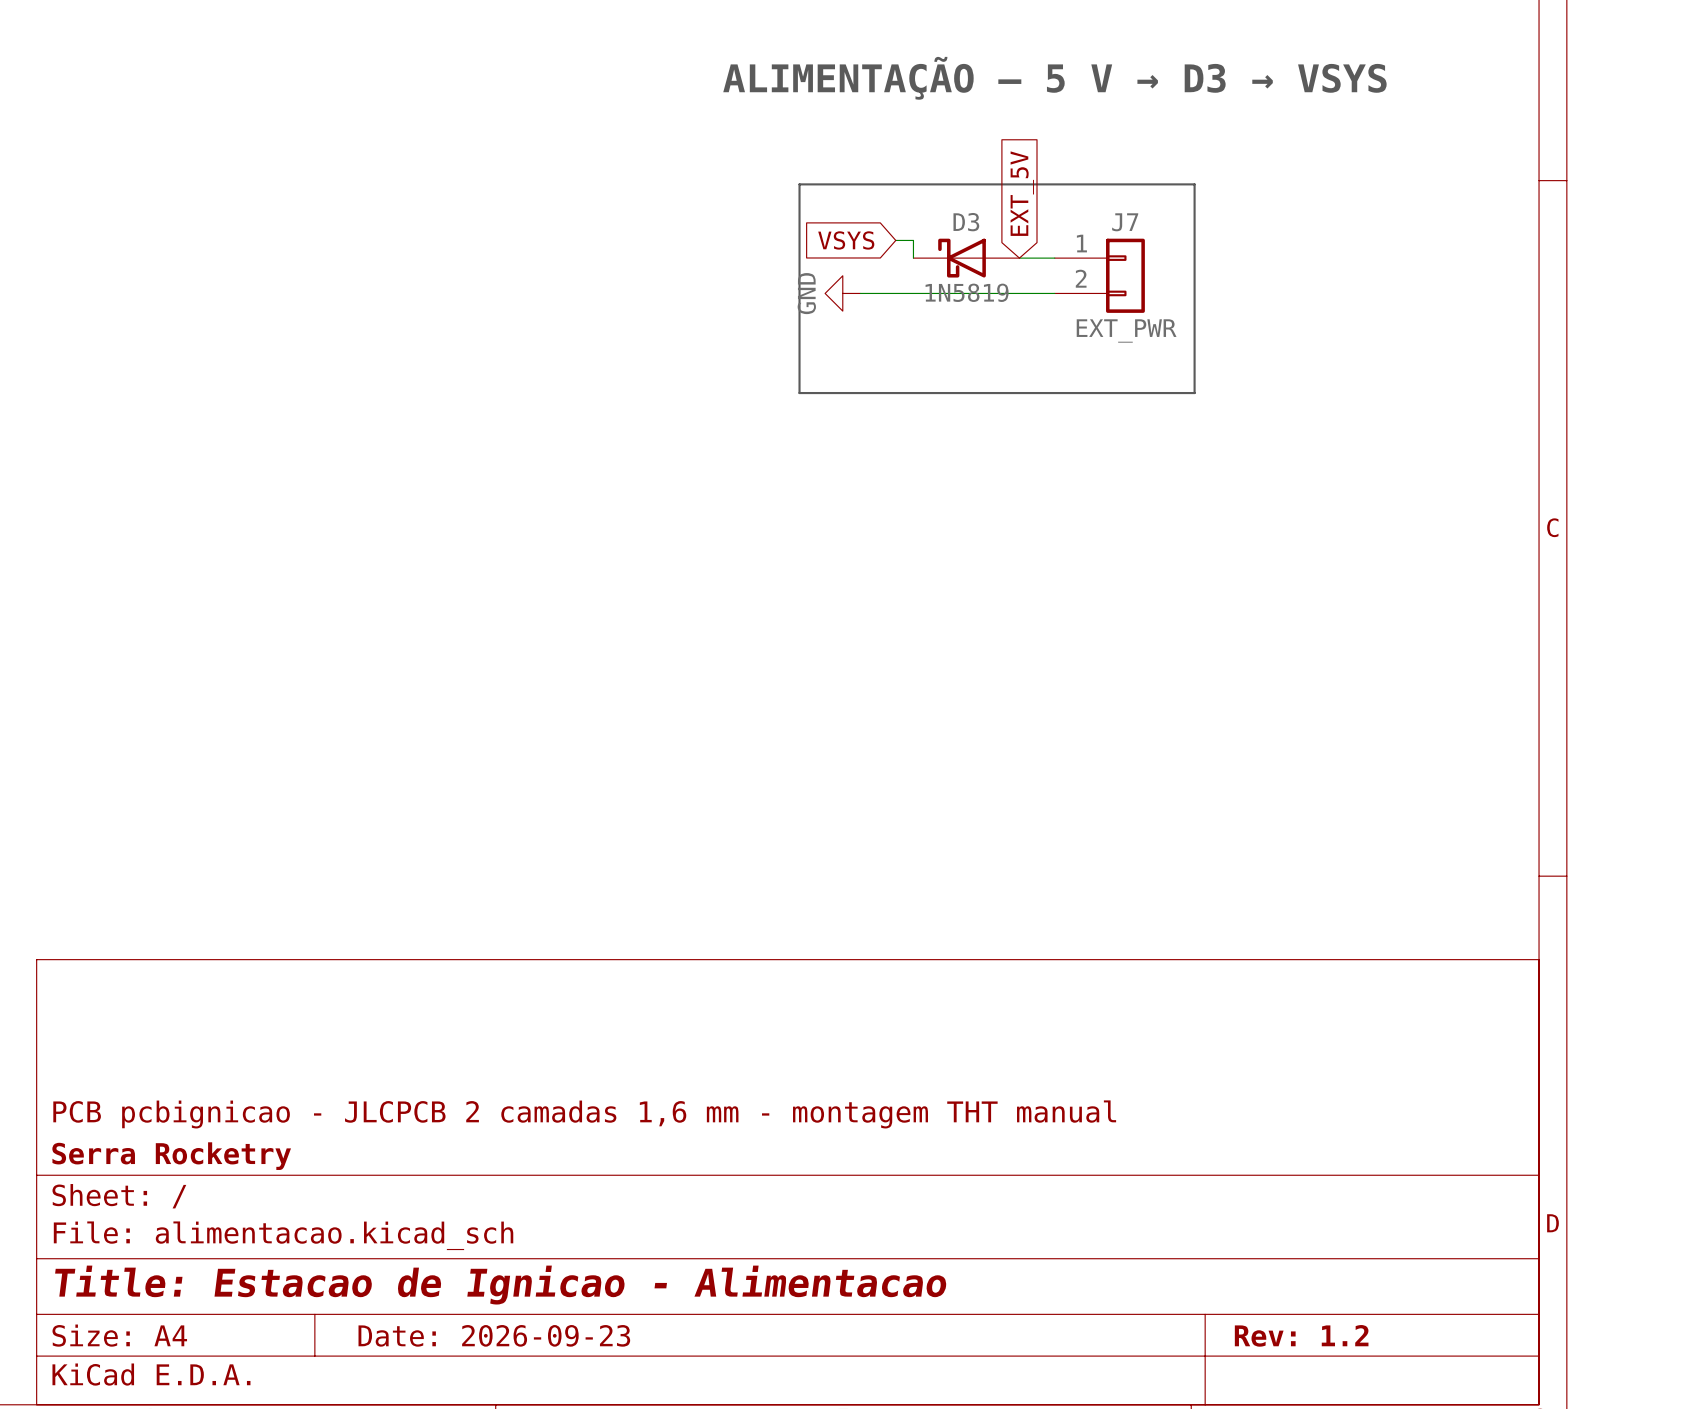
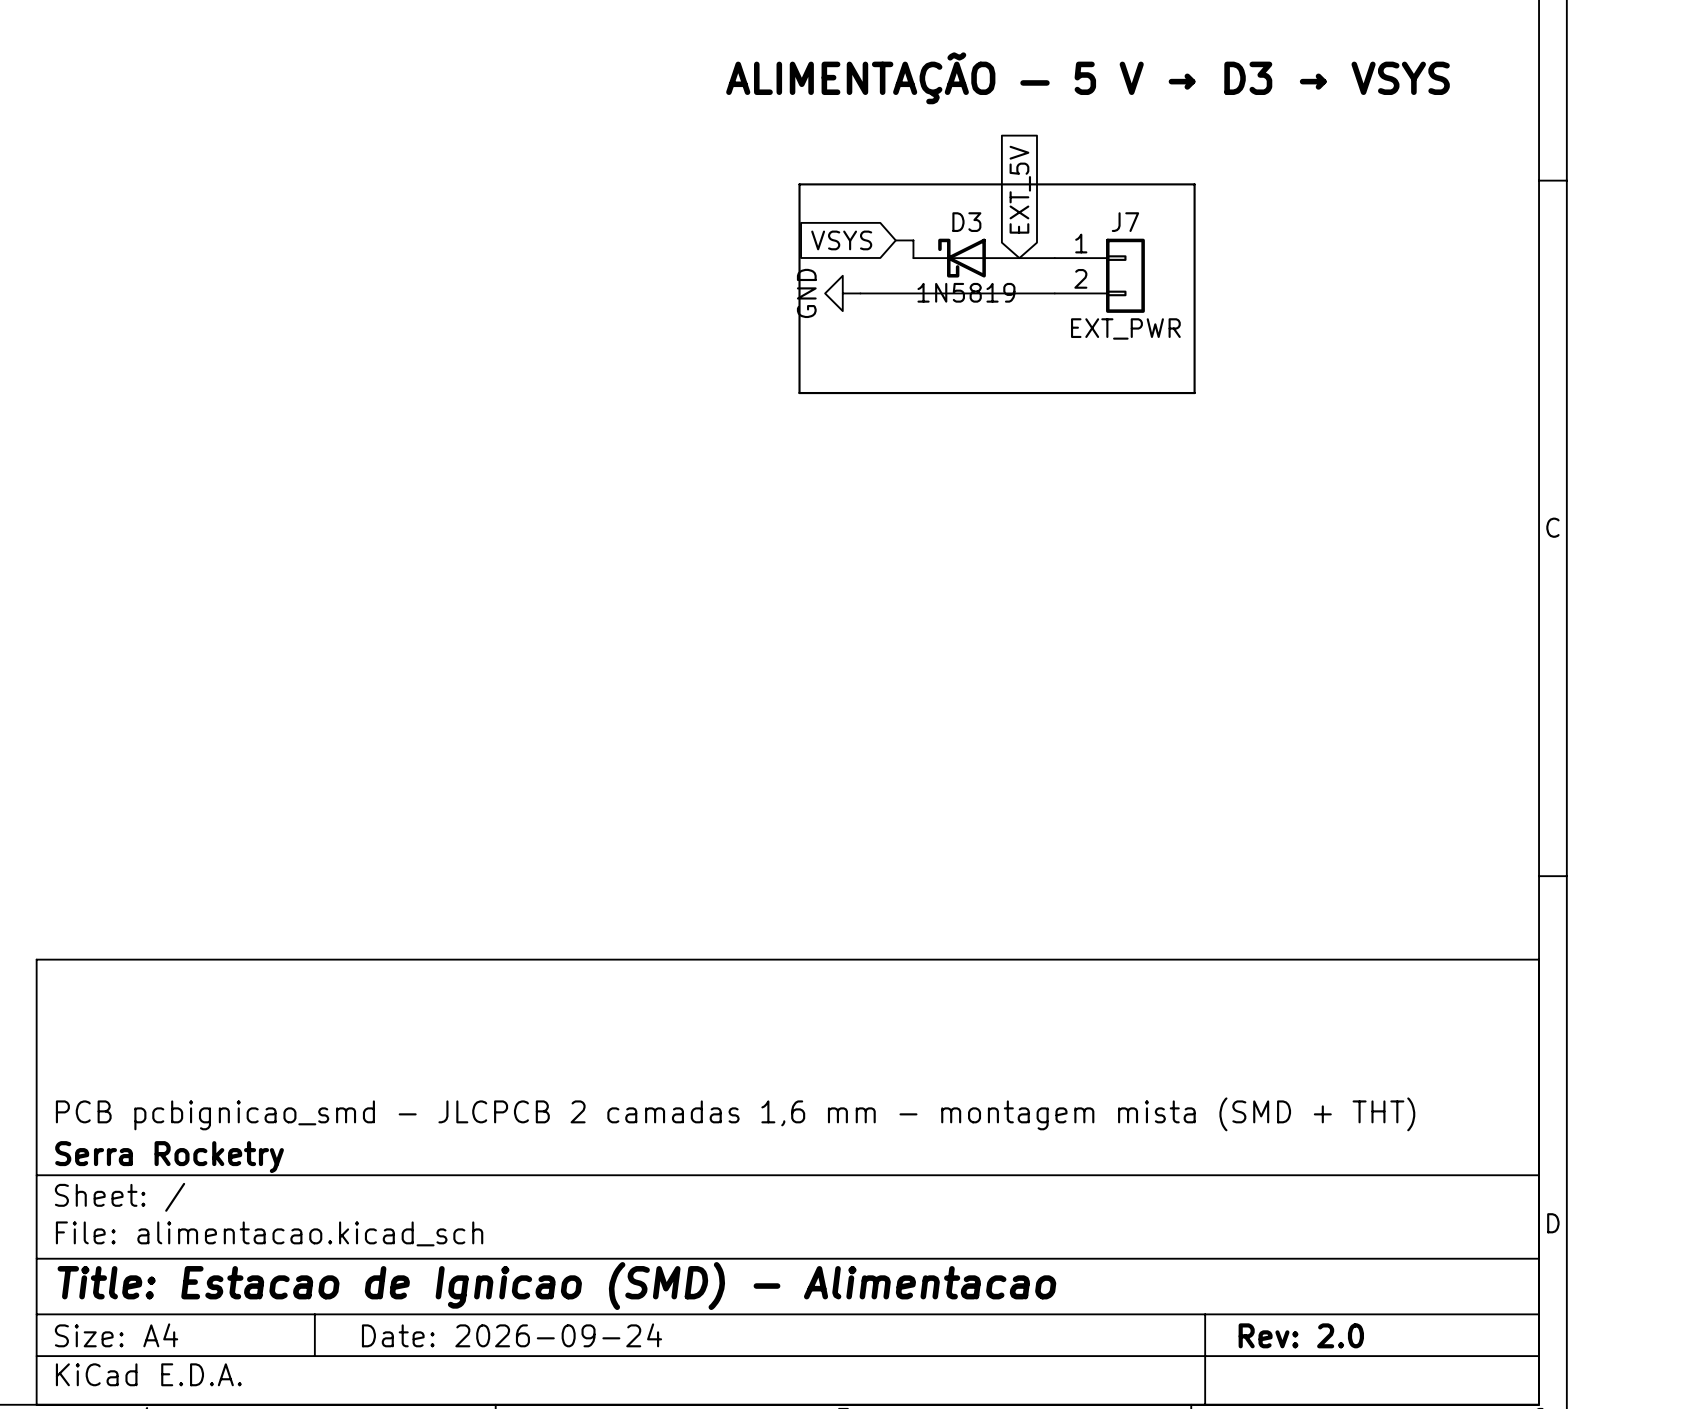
title block: PCB pcbignicao - JLCPCB 2 camadas 1,6 mm - montagem THT manual (584, 1114) -> PCB pcbignicao_smd - JLCPCB 2 camadas 1,6 mm - montagem mista (SMD + THT) (735, 1114)
title block: Title: Estacao de Ignicao - Alimentacao (500, 1285) -> Title: Estacao de Ignicao (SMD) - Alimentacao (556, 1286)
title block: Date: 2026-09-23 (494, 1335) -> Date: 2026-09-24 (512, 1335)
title block: Rev: 1.2 (1301, 1335) -> Rev: 2.0 (1301, 1335)

